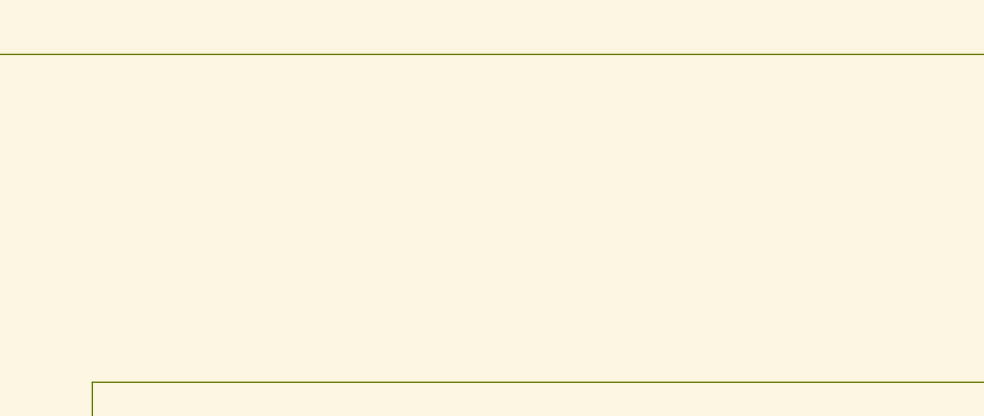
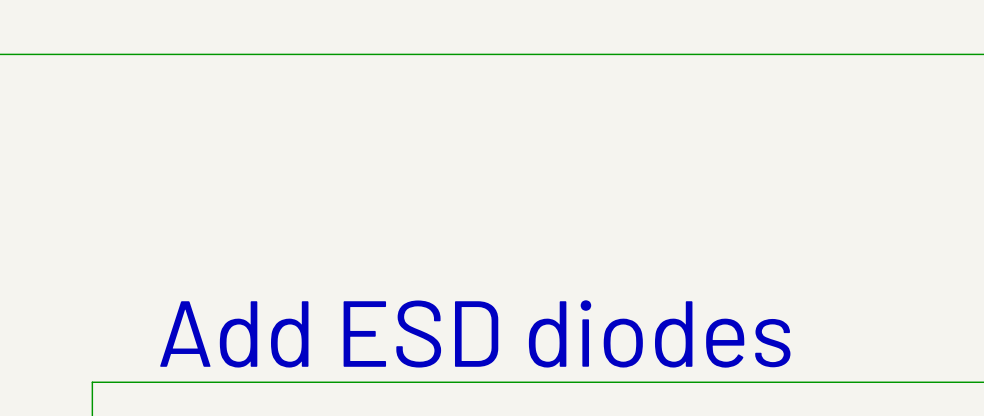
text: none -> Add ESD diodes (475, 333)

